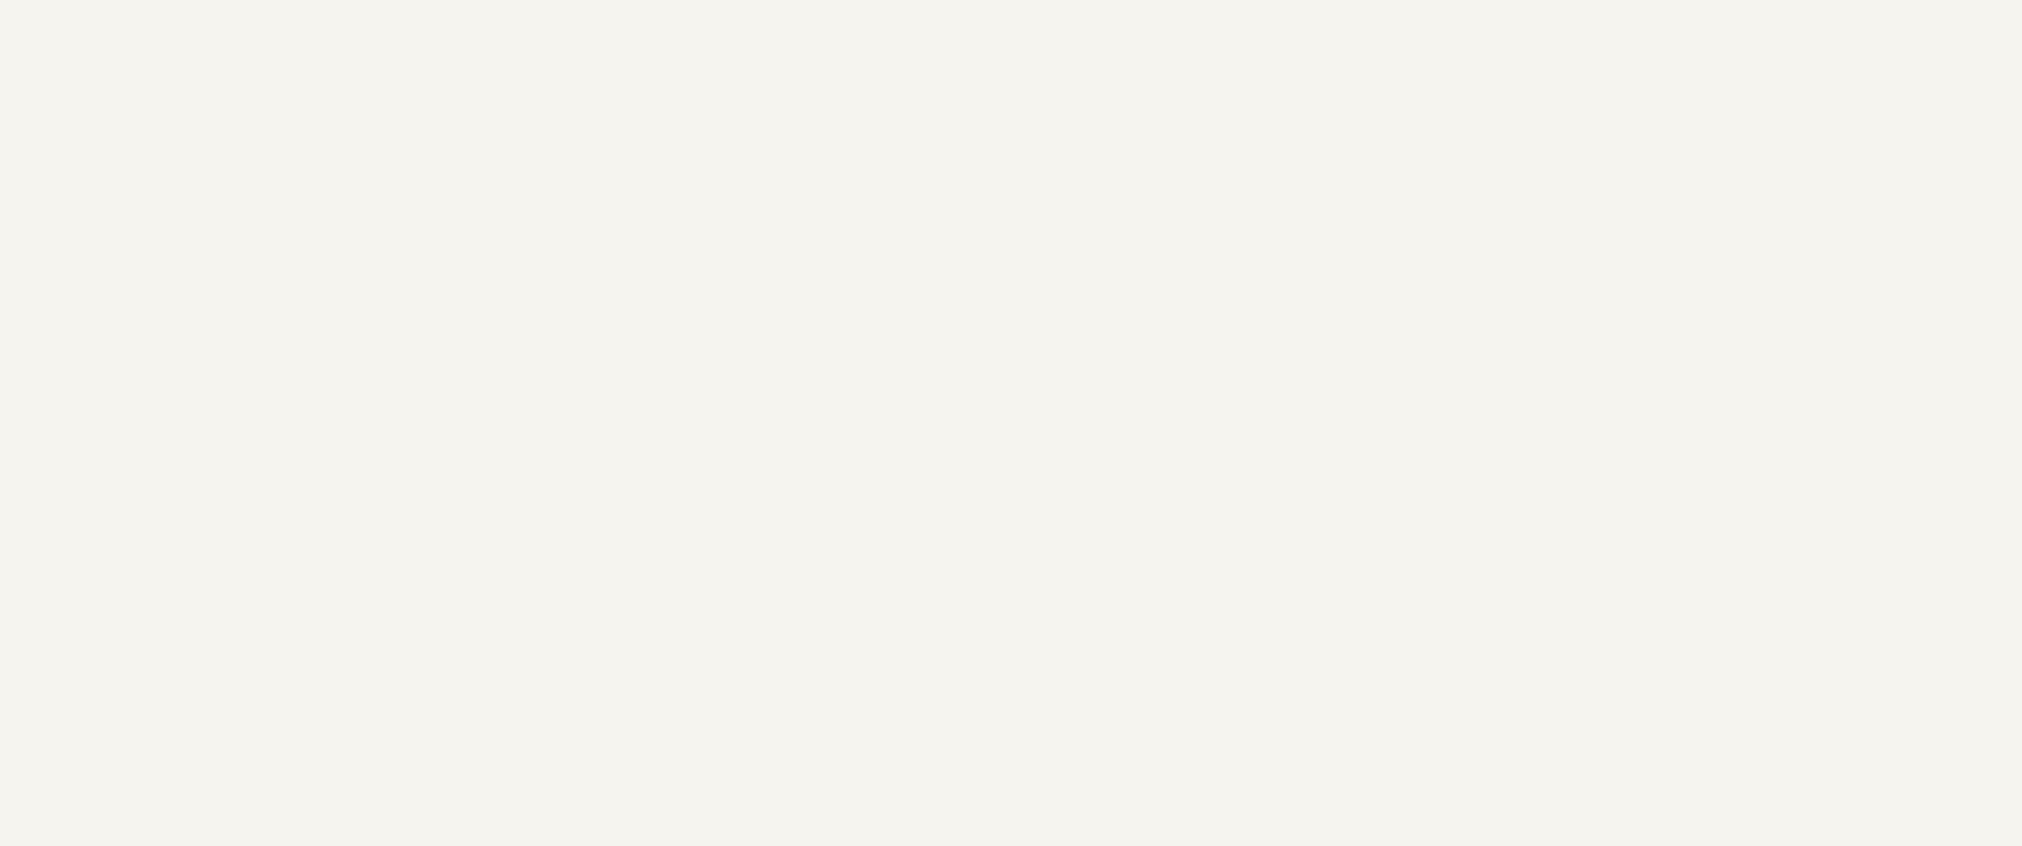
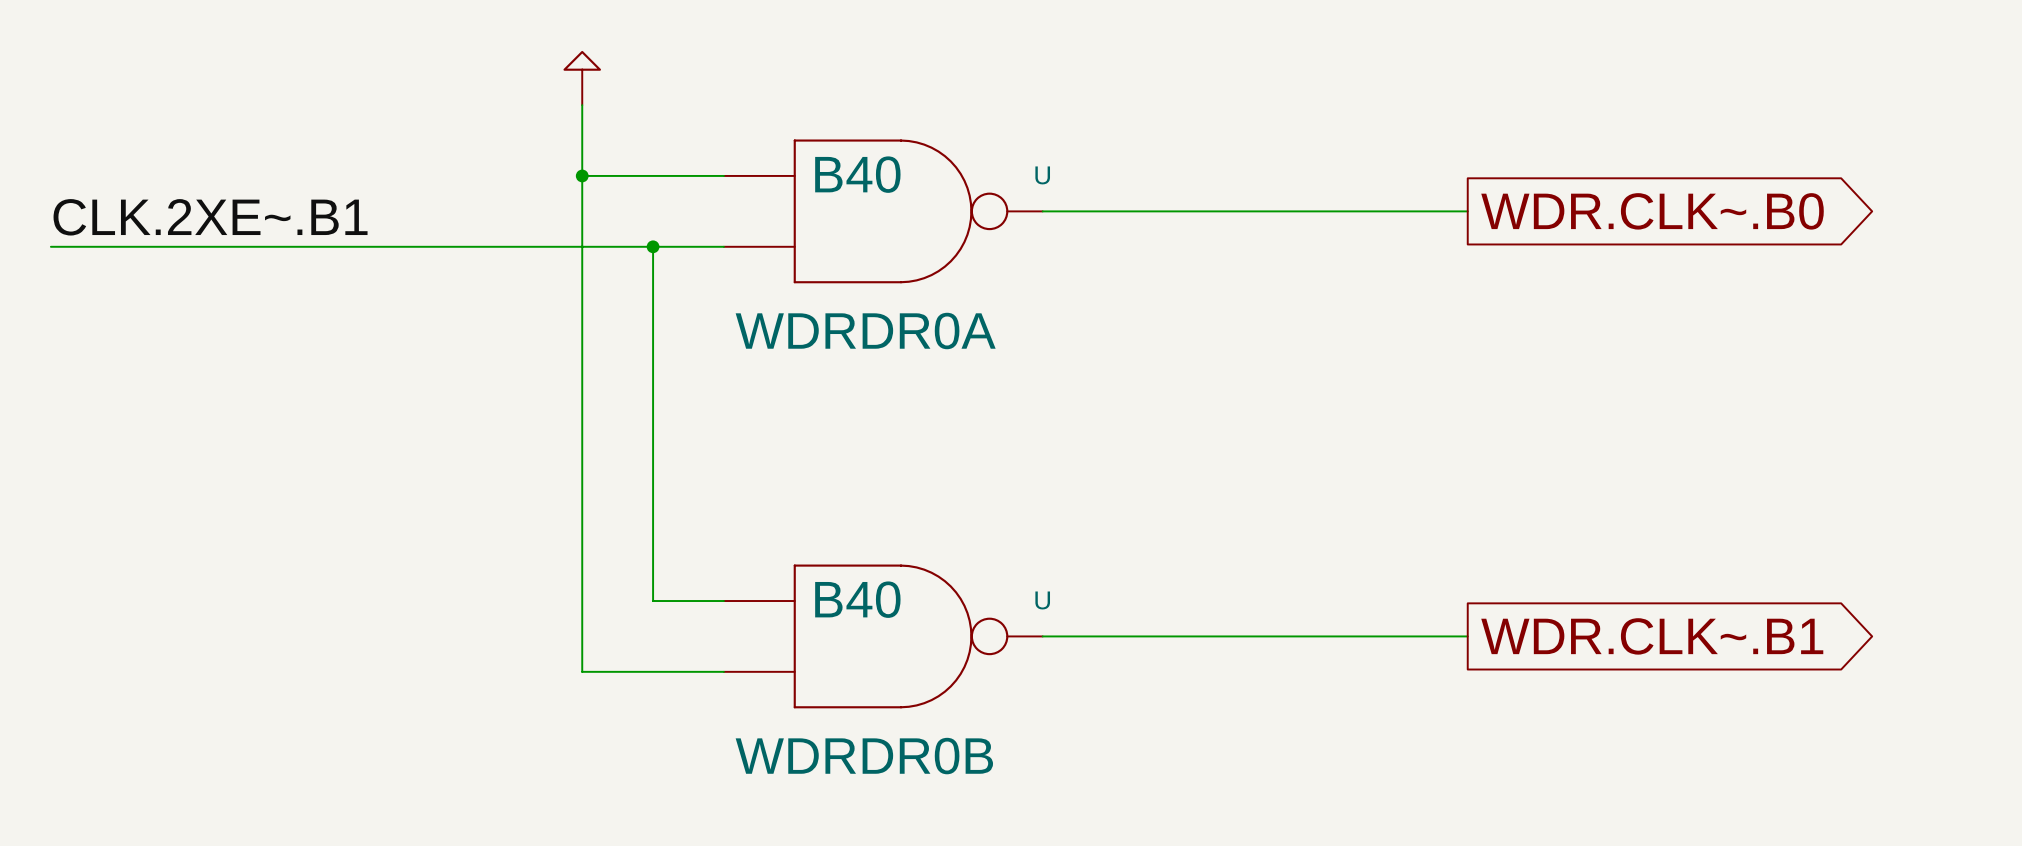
power symbol: none -> (582, 78)
wire: none -> (582, 105) (582, 671) (723, 671)
wire: none -> (582, 175) (723, 175)
junction: none -> (582, 175)
U: none -> (883, 211)
wire: none -> (1042, 211) (1467, 211)
global label: none -> WDR.CLK~.B0 (1652, 211)
label: none -> CLK.2XE~.B1 (210, 217)
wire: none -> (50, 246) (723, 246)
wire: none -> (653, 246) (653, 601) (723, 601)
junction: none -> (653, 246)
U: none -> (883, 636)
wire: none -> (1042, 636) (1467, 636)
global label: none -> WDR.CLK~.B1 (1652, 636)

